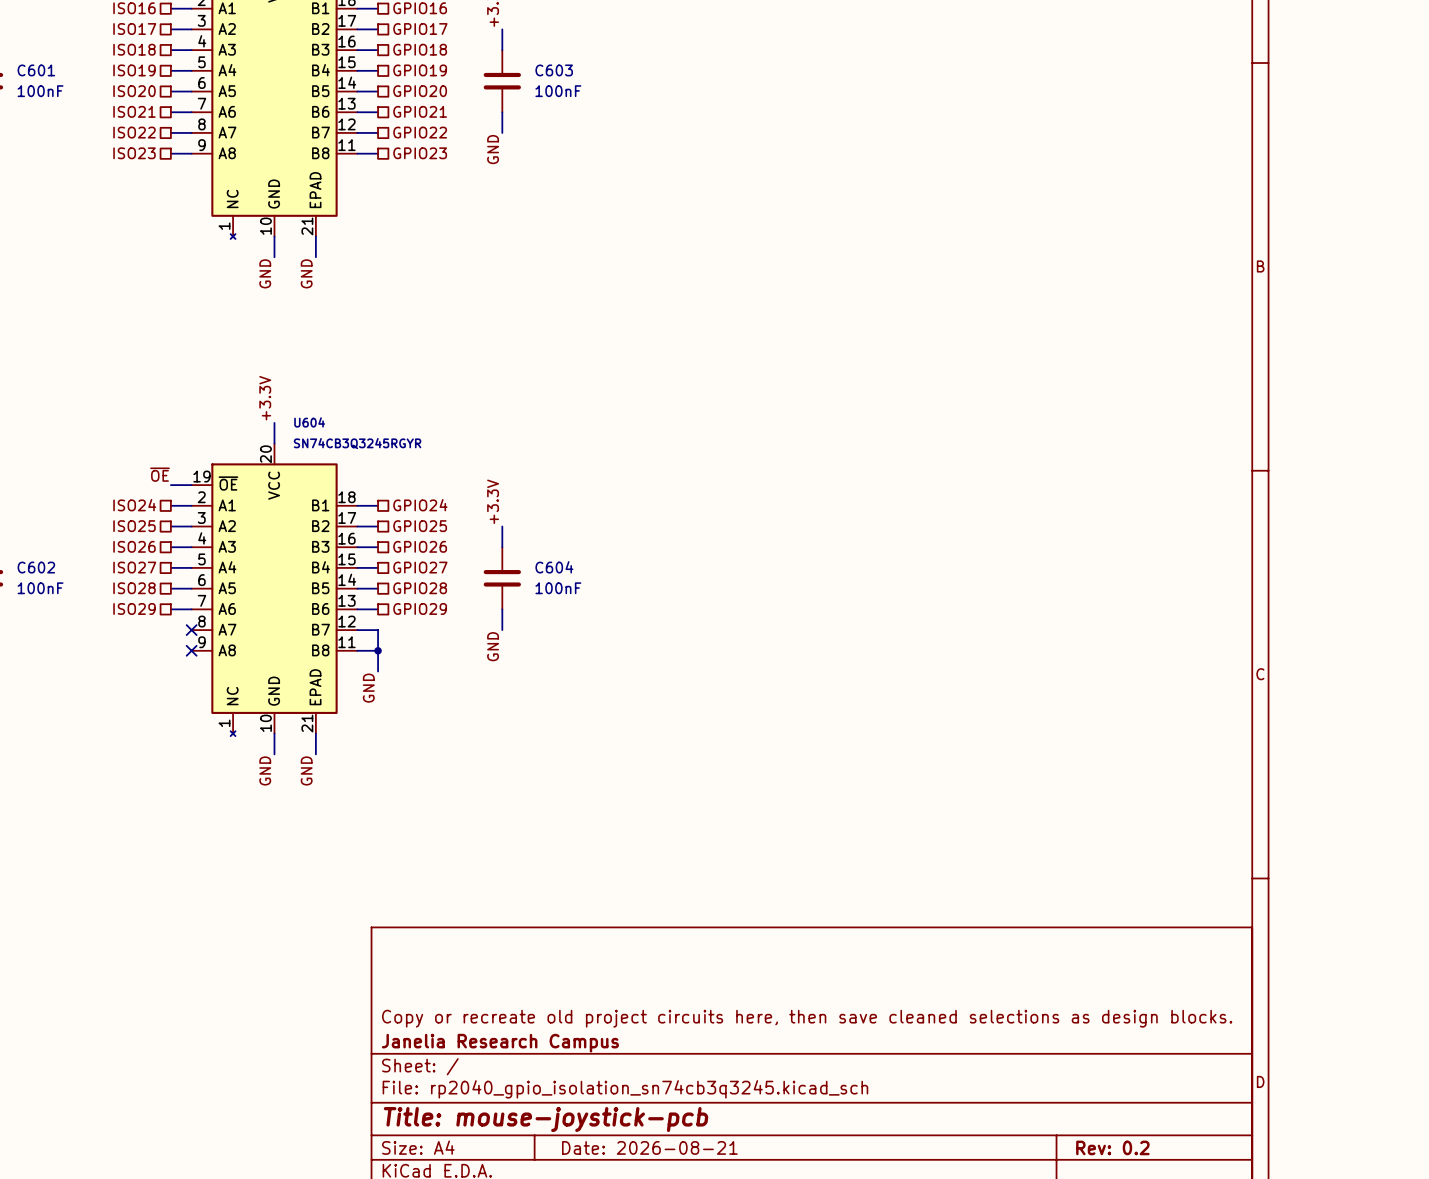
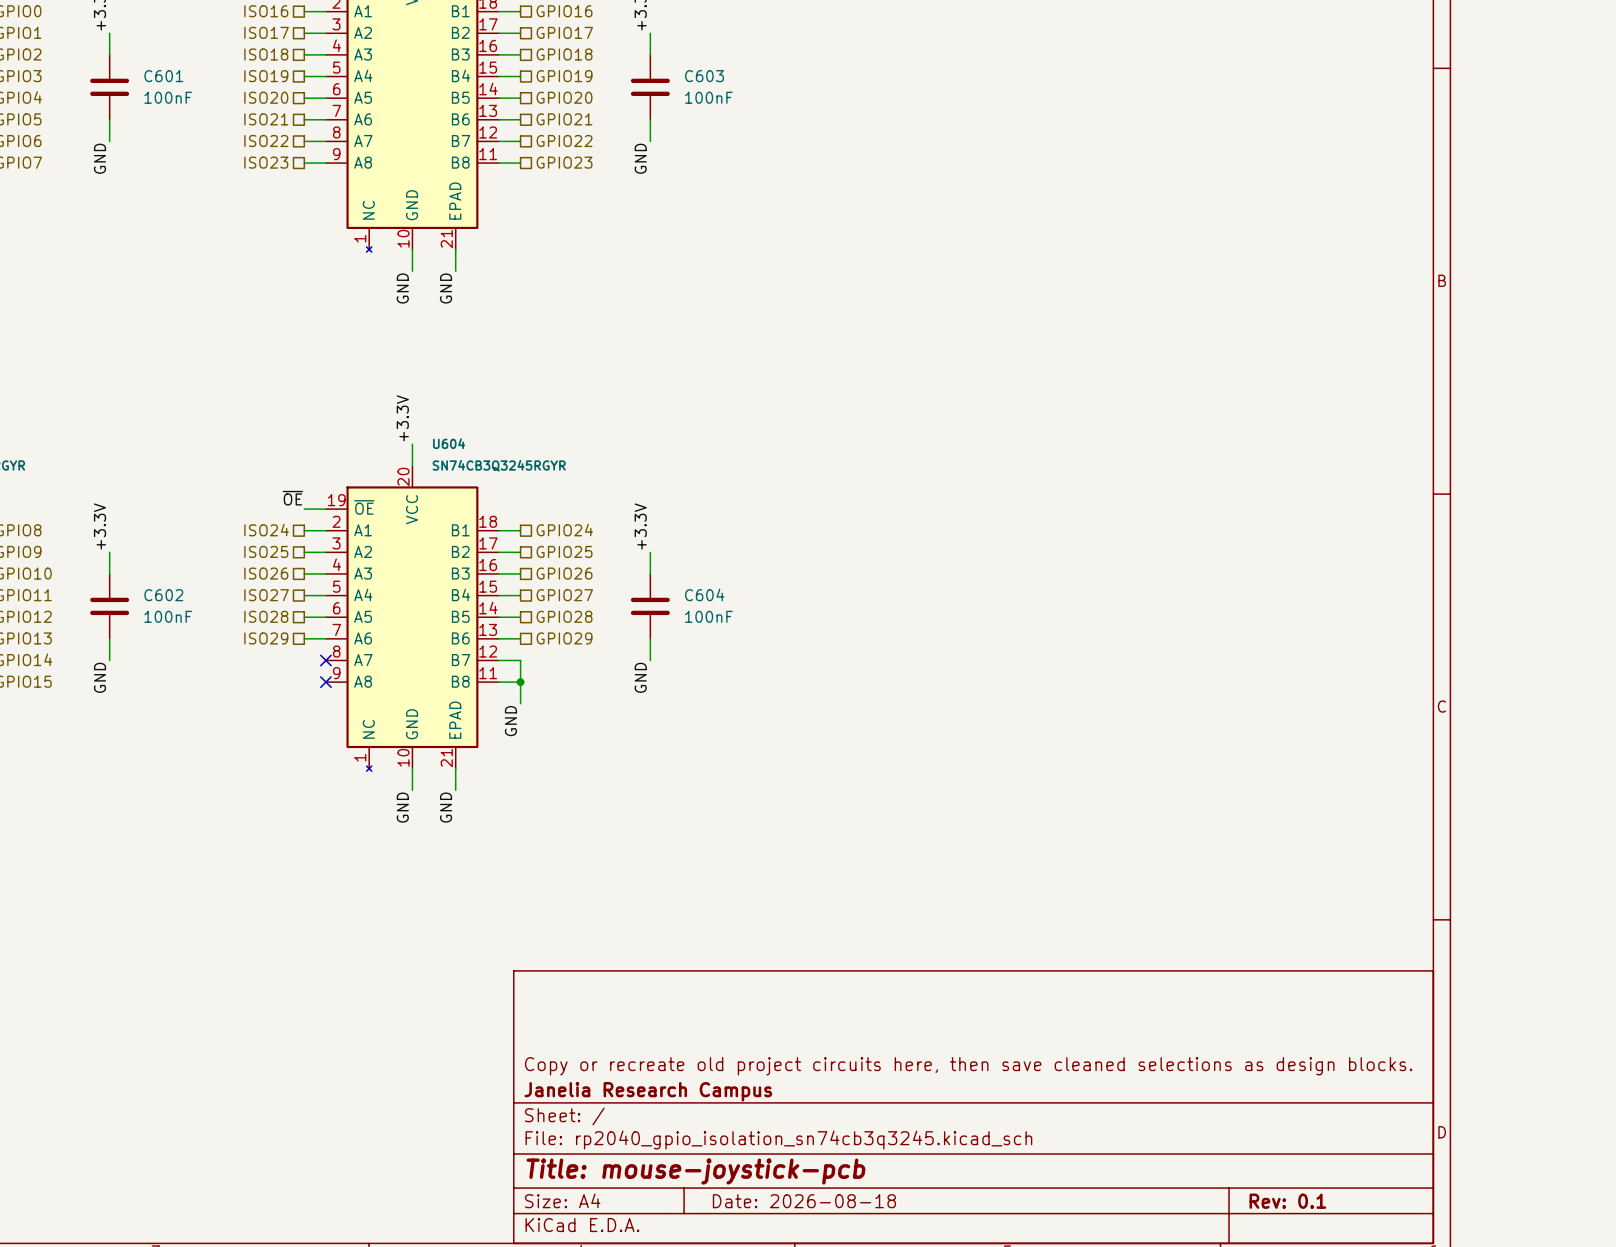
title block: Date: 2026-08-21 (649, 1147) -> Date: 2026-08-18 (804, 1201)
title block: Rev: 0.2 (1112, 1147) -> Rev: 0.1 (1287, 1201)

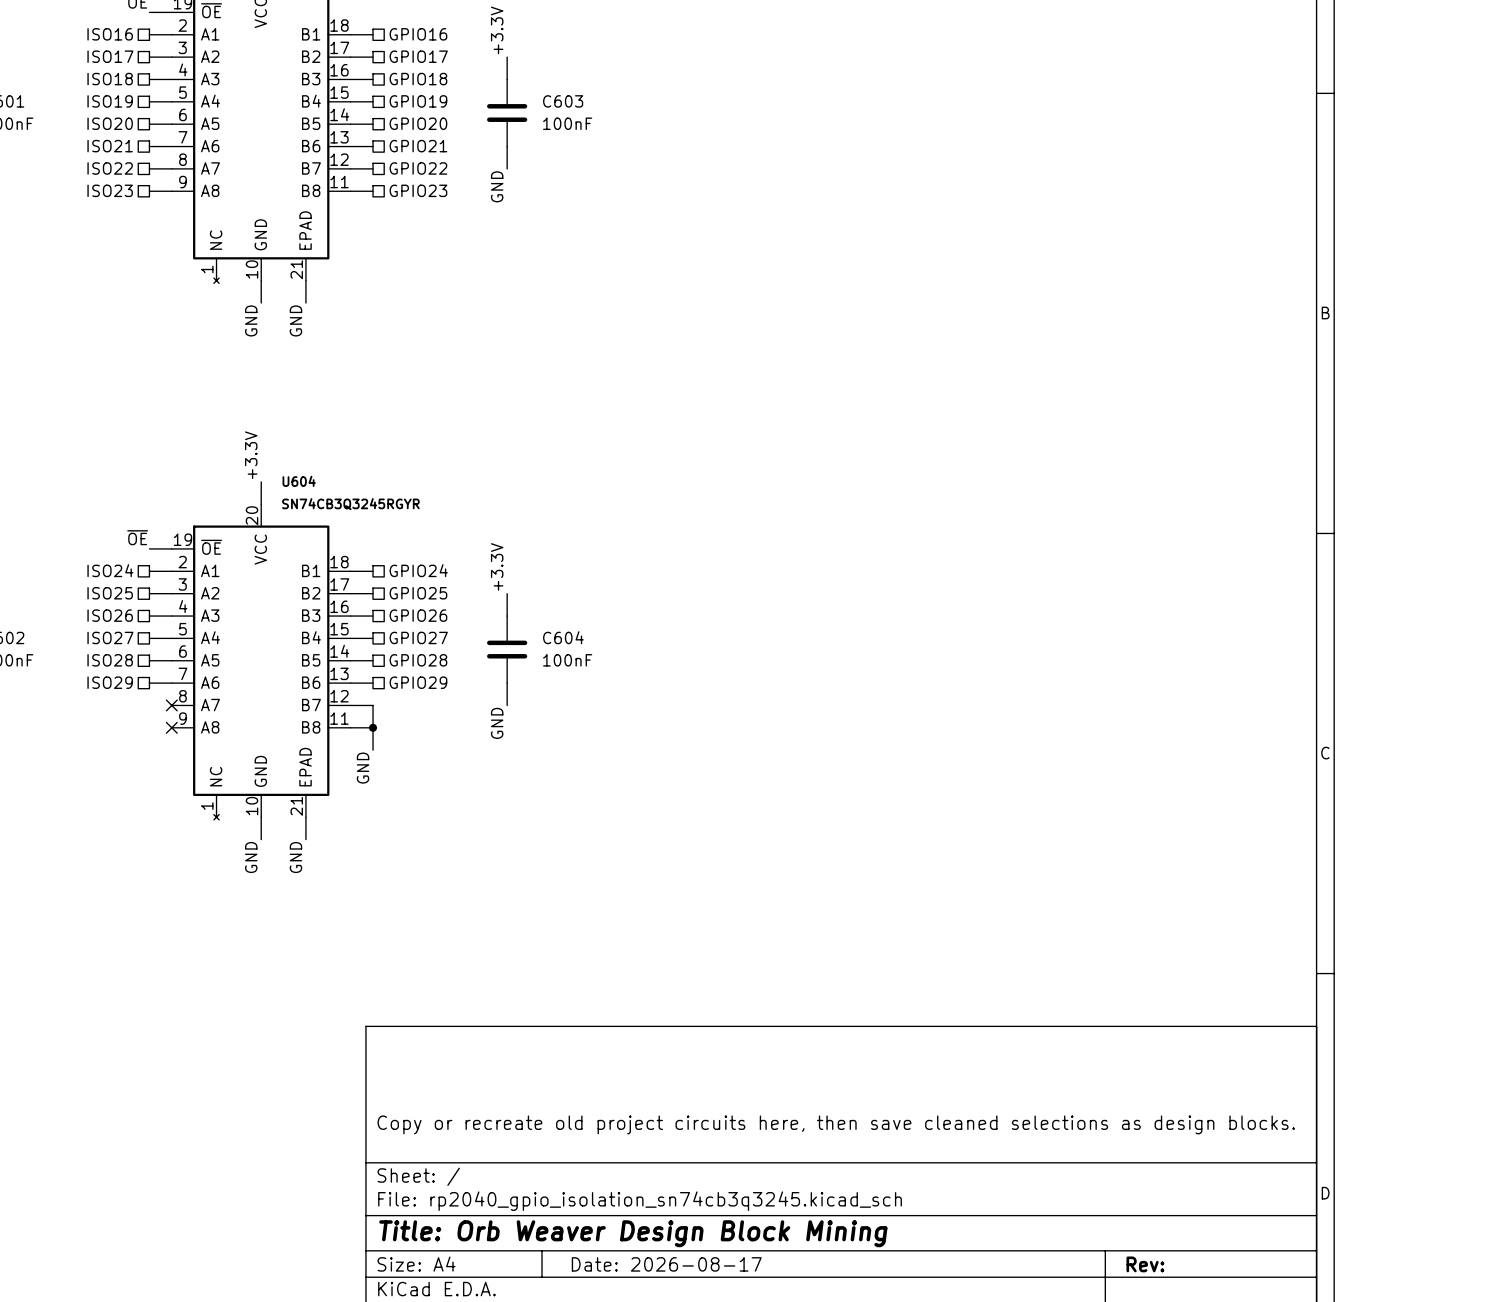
title block: Janelia Research Campus (648, 1091) -> none
title block: Title: mouse-joystick-pcb (695, 1171) -> Title: Orb Weaver Design Block Mining (633, 1233)
title block: Date: 2026-08-18 (804, 1201) -> Date: 2026-08-17 (666, 1264)
title block: Rev: 0.1 (1287, 1201) -> Rev: (1145, 1264)

